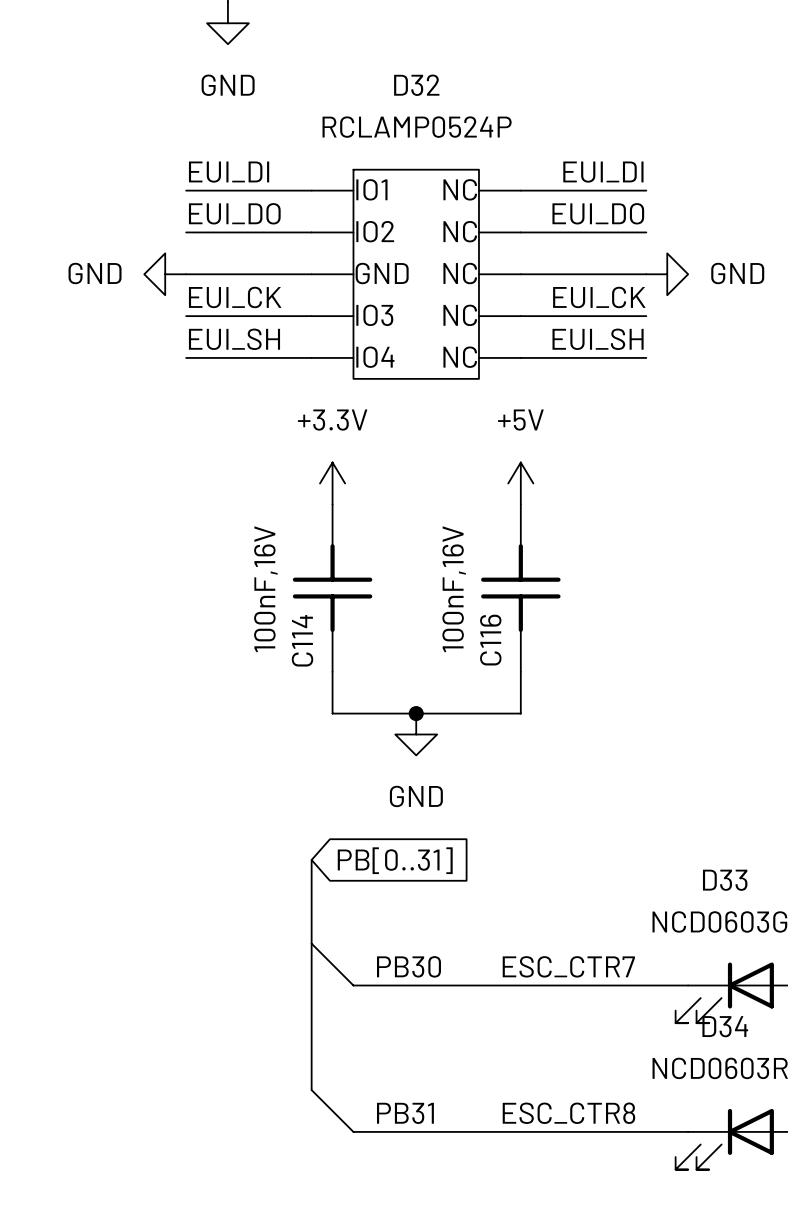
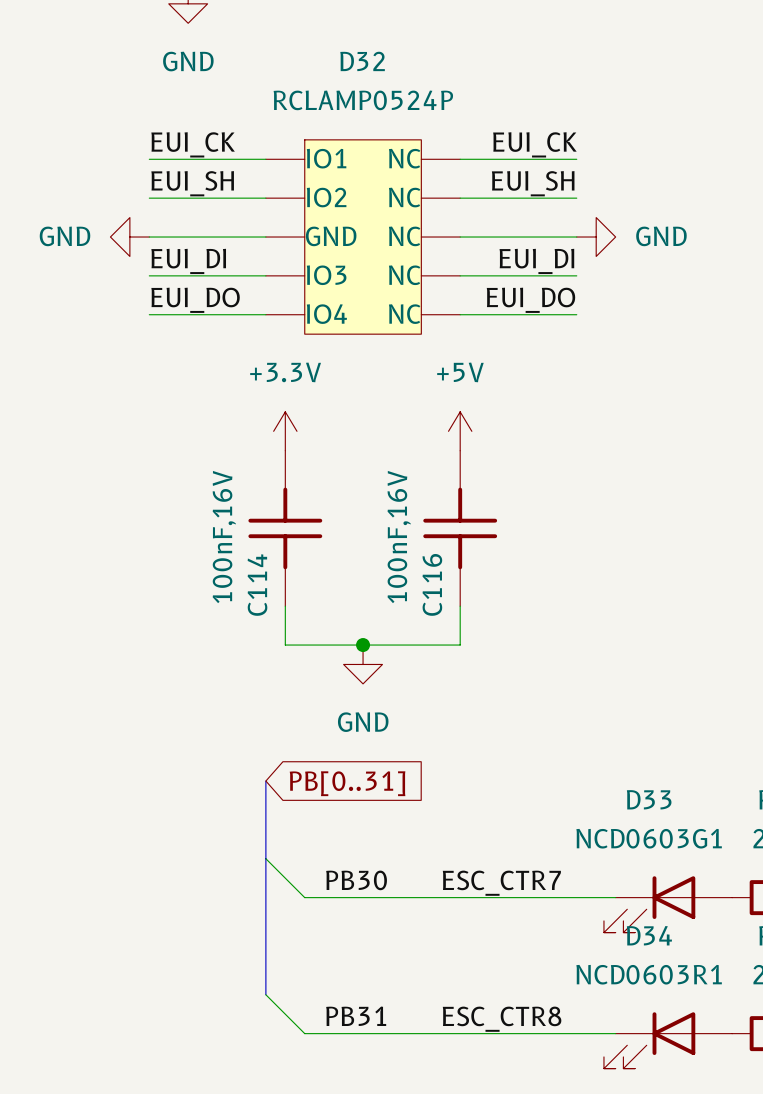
label: EUI_DI (229, 172) -> EUI_CK (193, 144)
label: EUI_DI (603, 172) -> EUI_CK (534, 144)
label: EUI_DO (234, 213) -> EUI_SH (192, 183)
label: EUI_DO (598, 213) -> EUI_SH (533, 183)
label: EUI_CK (235, 297) -> EUI_DI (188, 261)
label: EUI_CK (599, 297) -> EUI_DI (536, 261)
label: EUI_SH (234, 339) -> EUI_DO (195, 300)
label: EUI_SH (598, 339) -> EUI_DO (530, 300)

